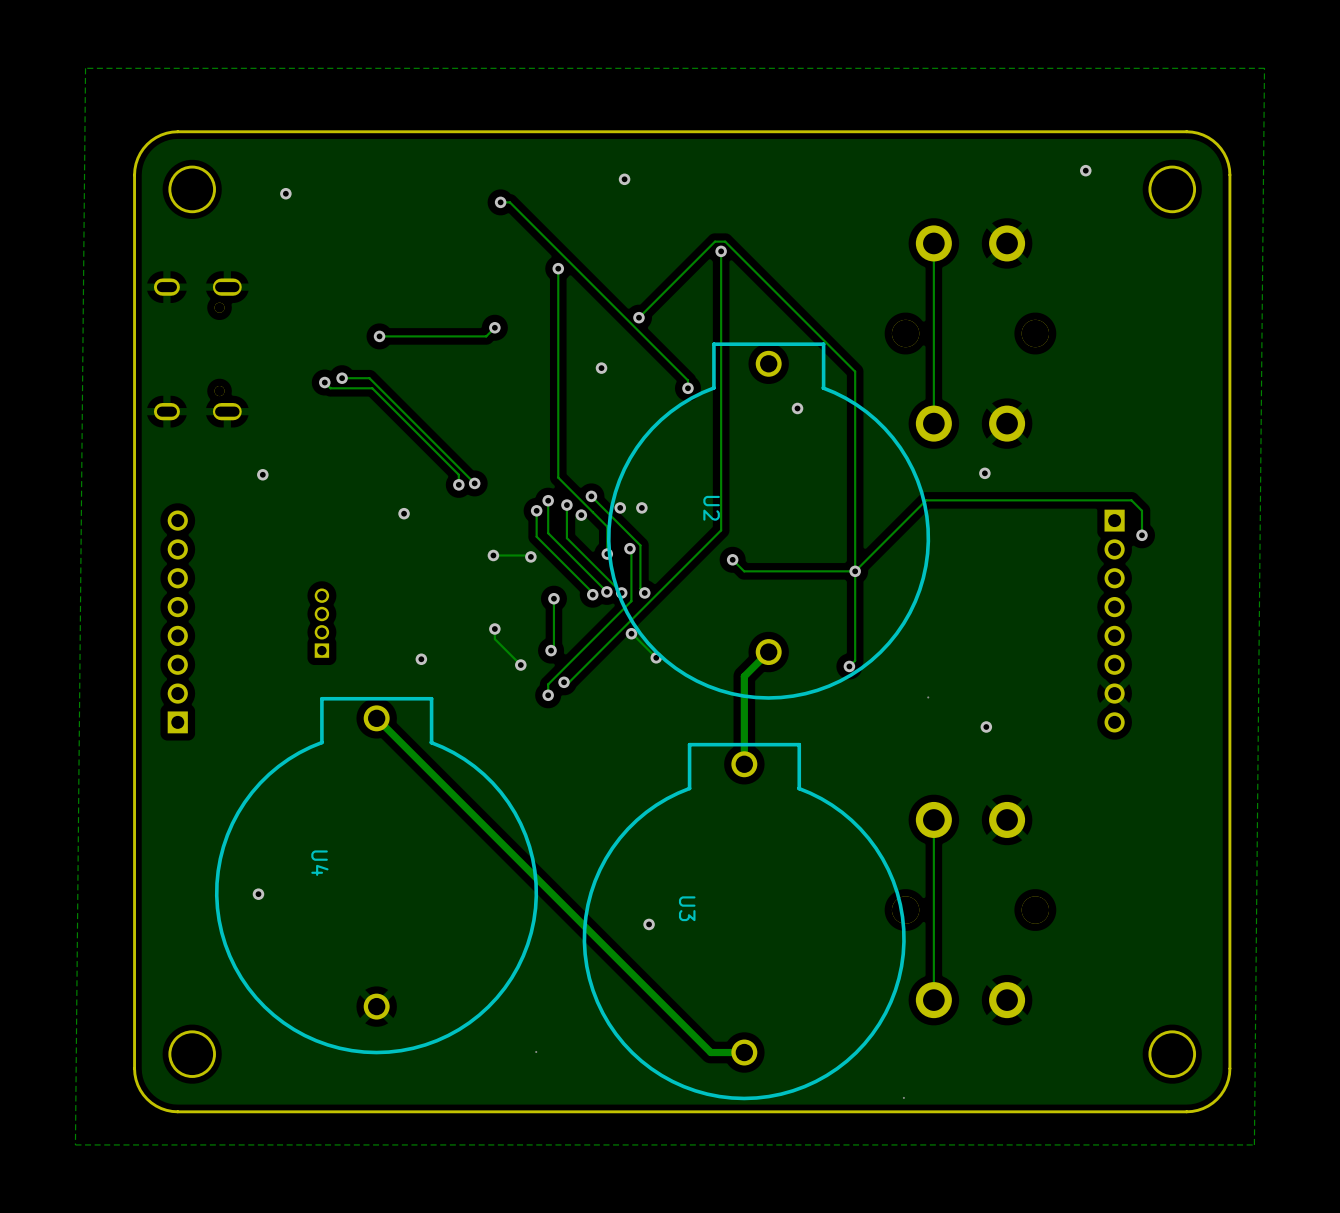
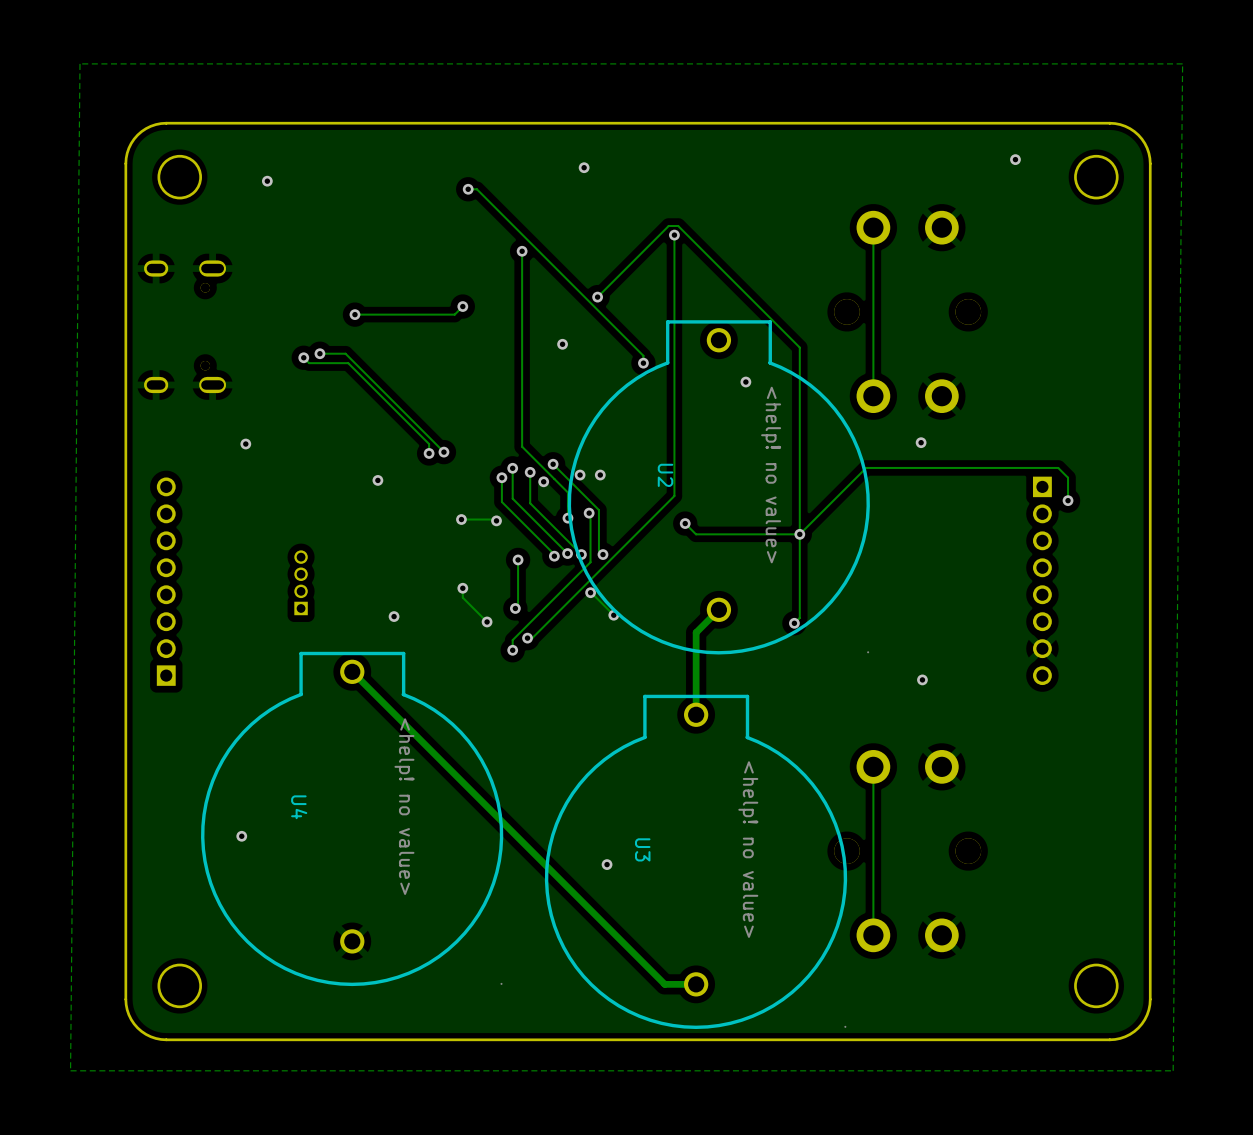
U2 value: none -> <help! no value> (771, 475)
U4 value: none -> <help! no value> (404, 806)
U3 value: none -> <help! no value> (748, 849)

